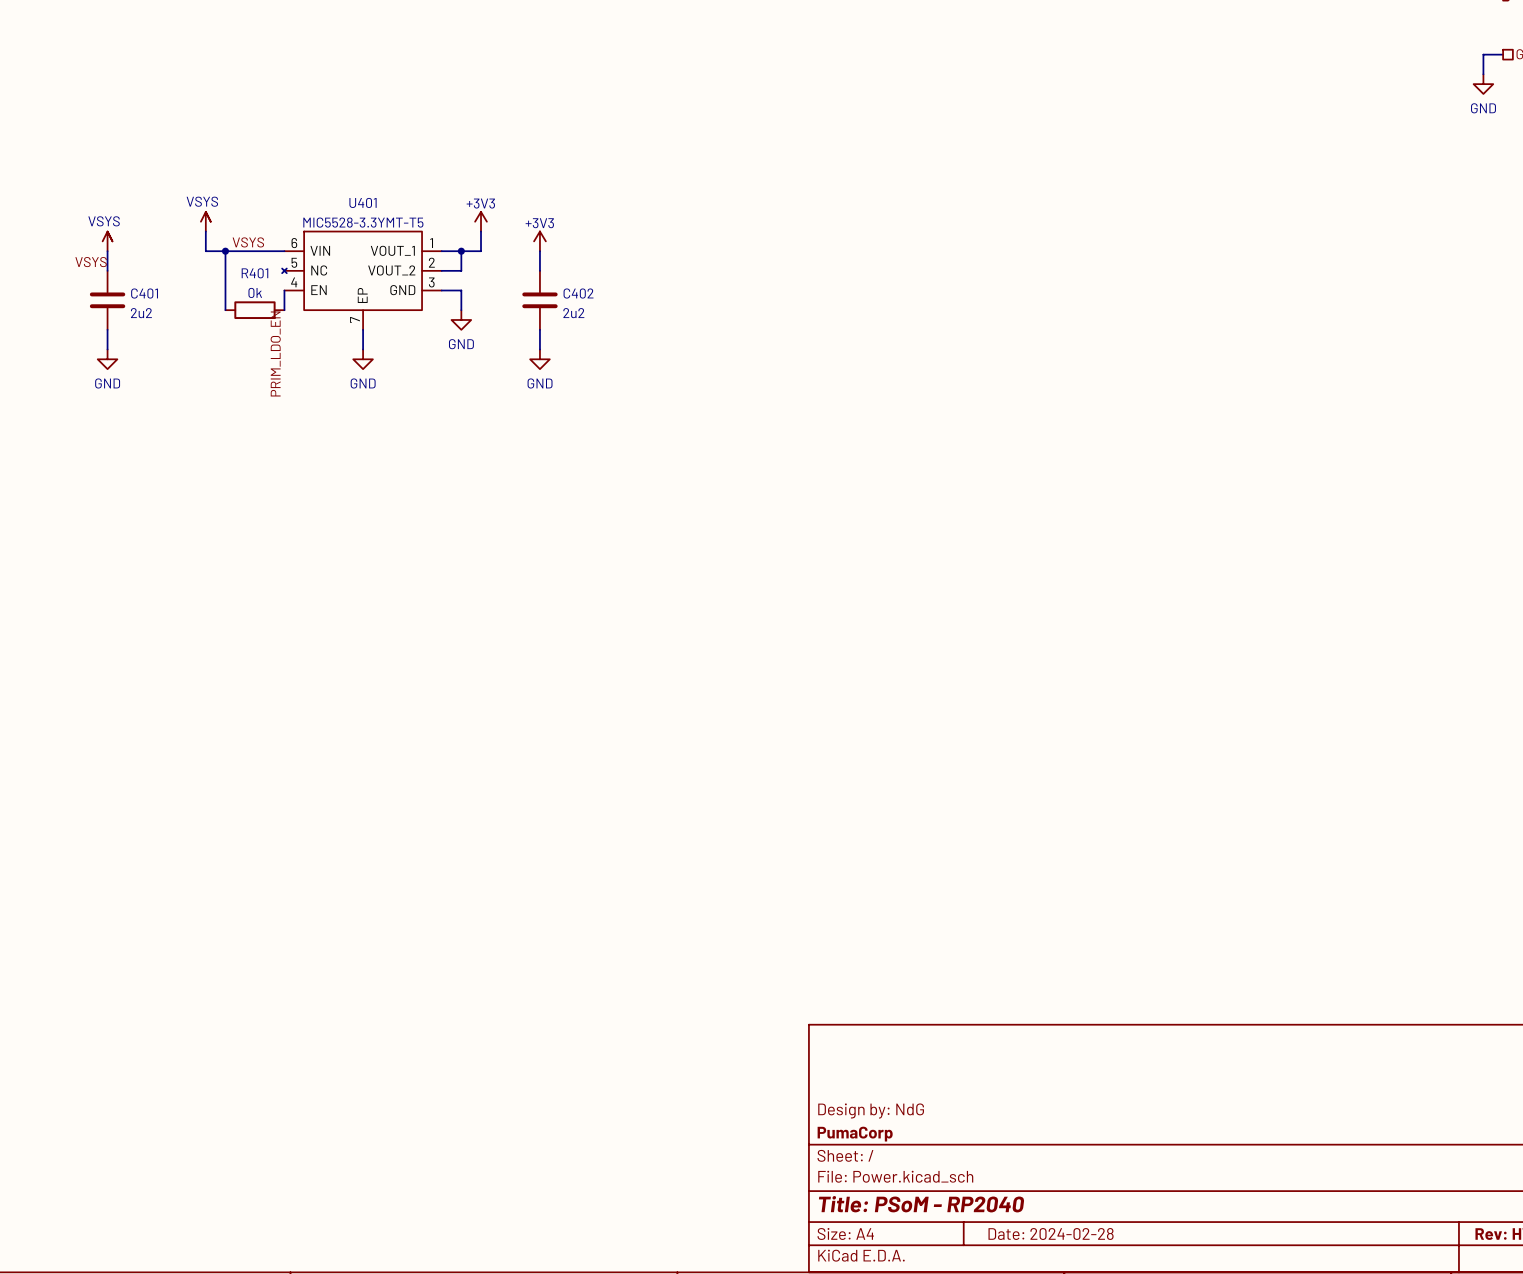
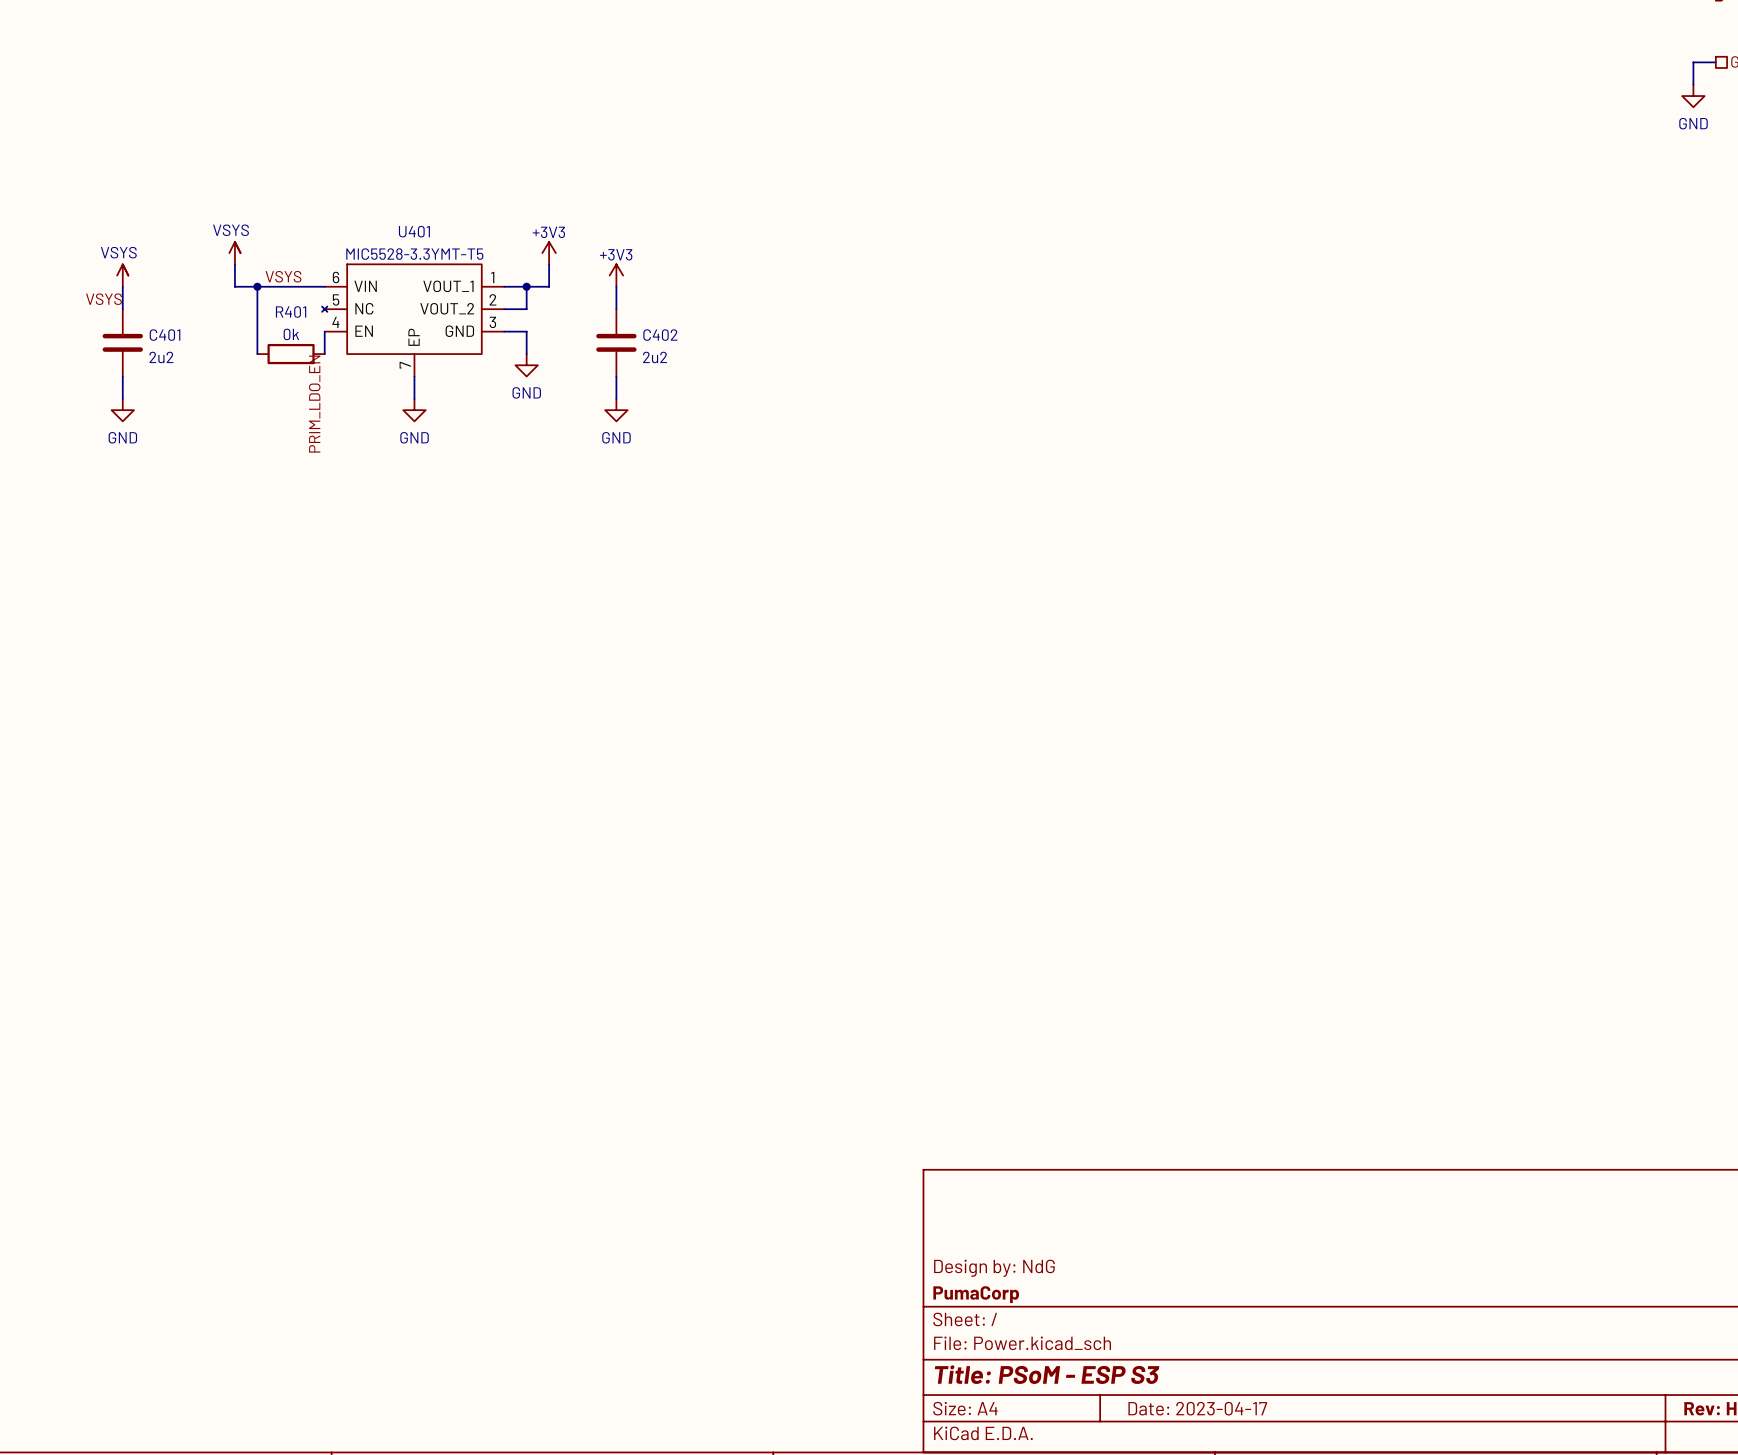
title block: Title: PSoM - RP2040 (921, 1204) -> Title: PSoM - ESP S3 (1047, 1374)
title block: Date: 2024-02-28 (1051, 1233) -> Date: 2023-04-17 (1197, 1408)

